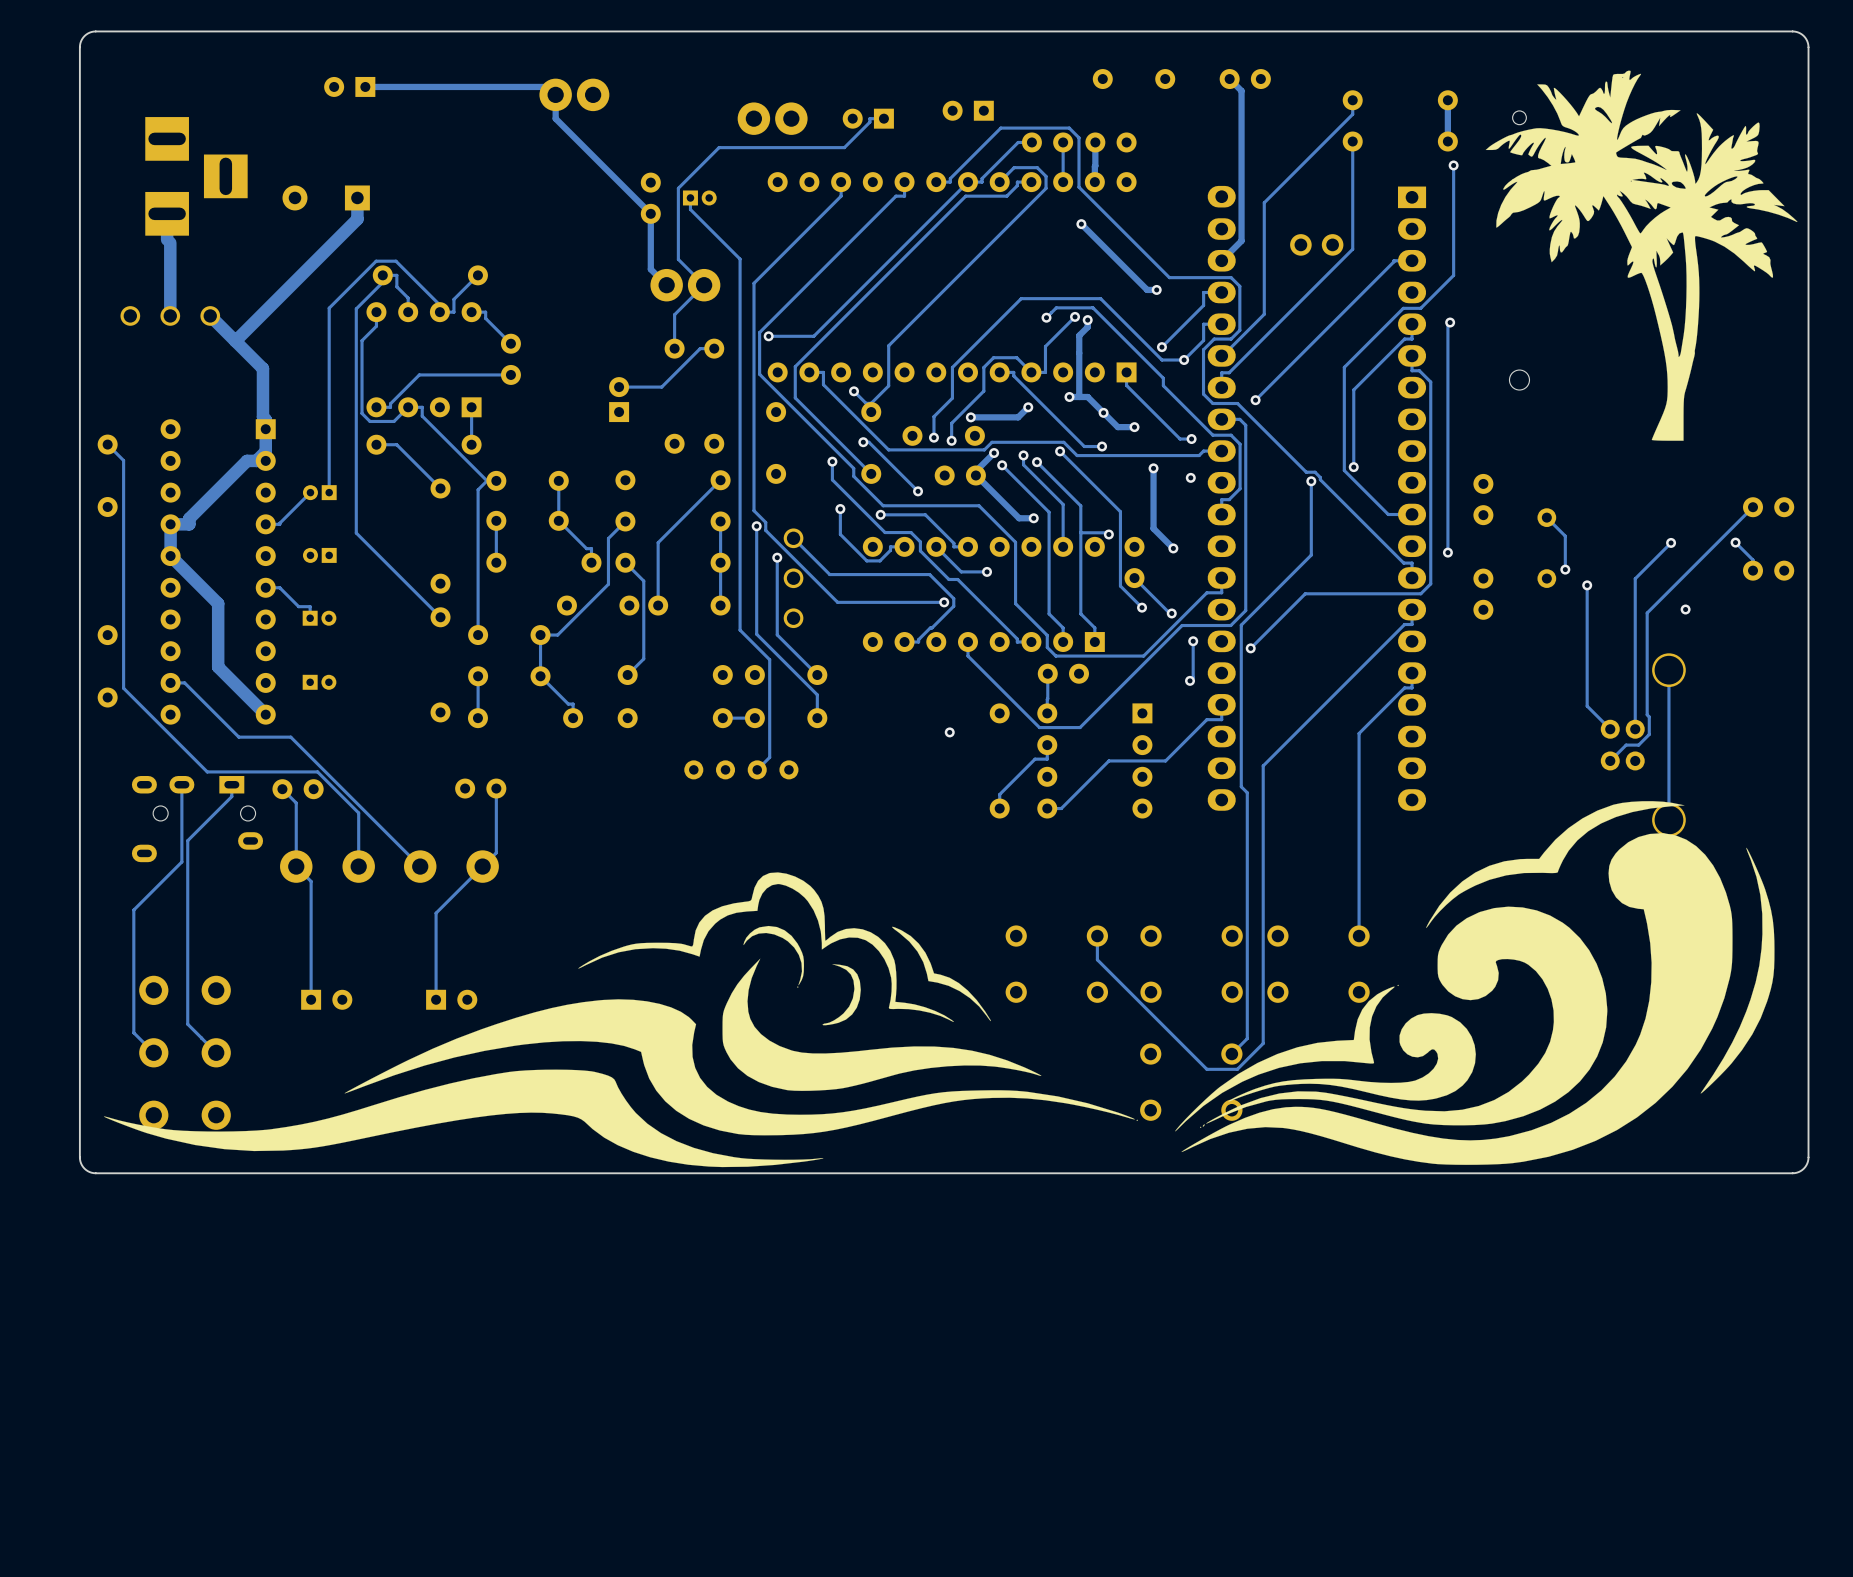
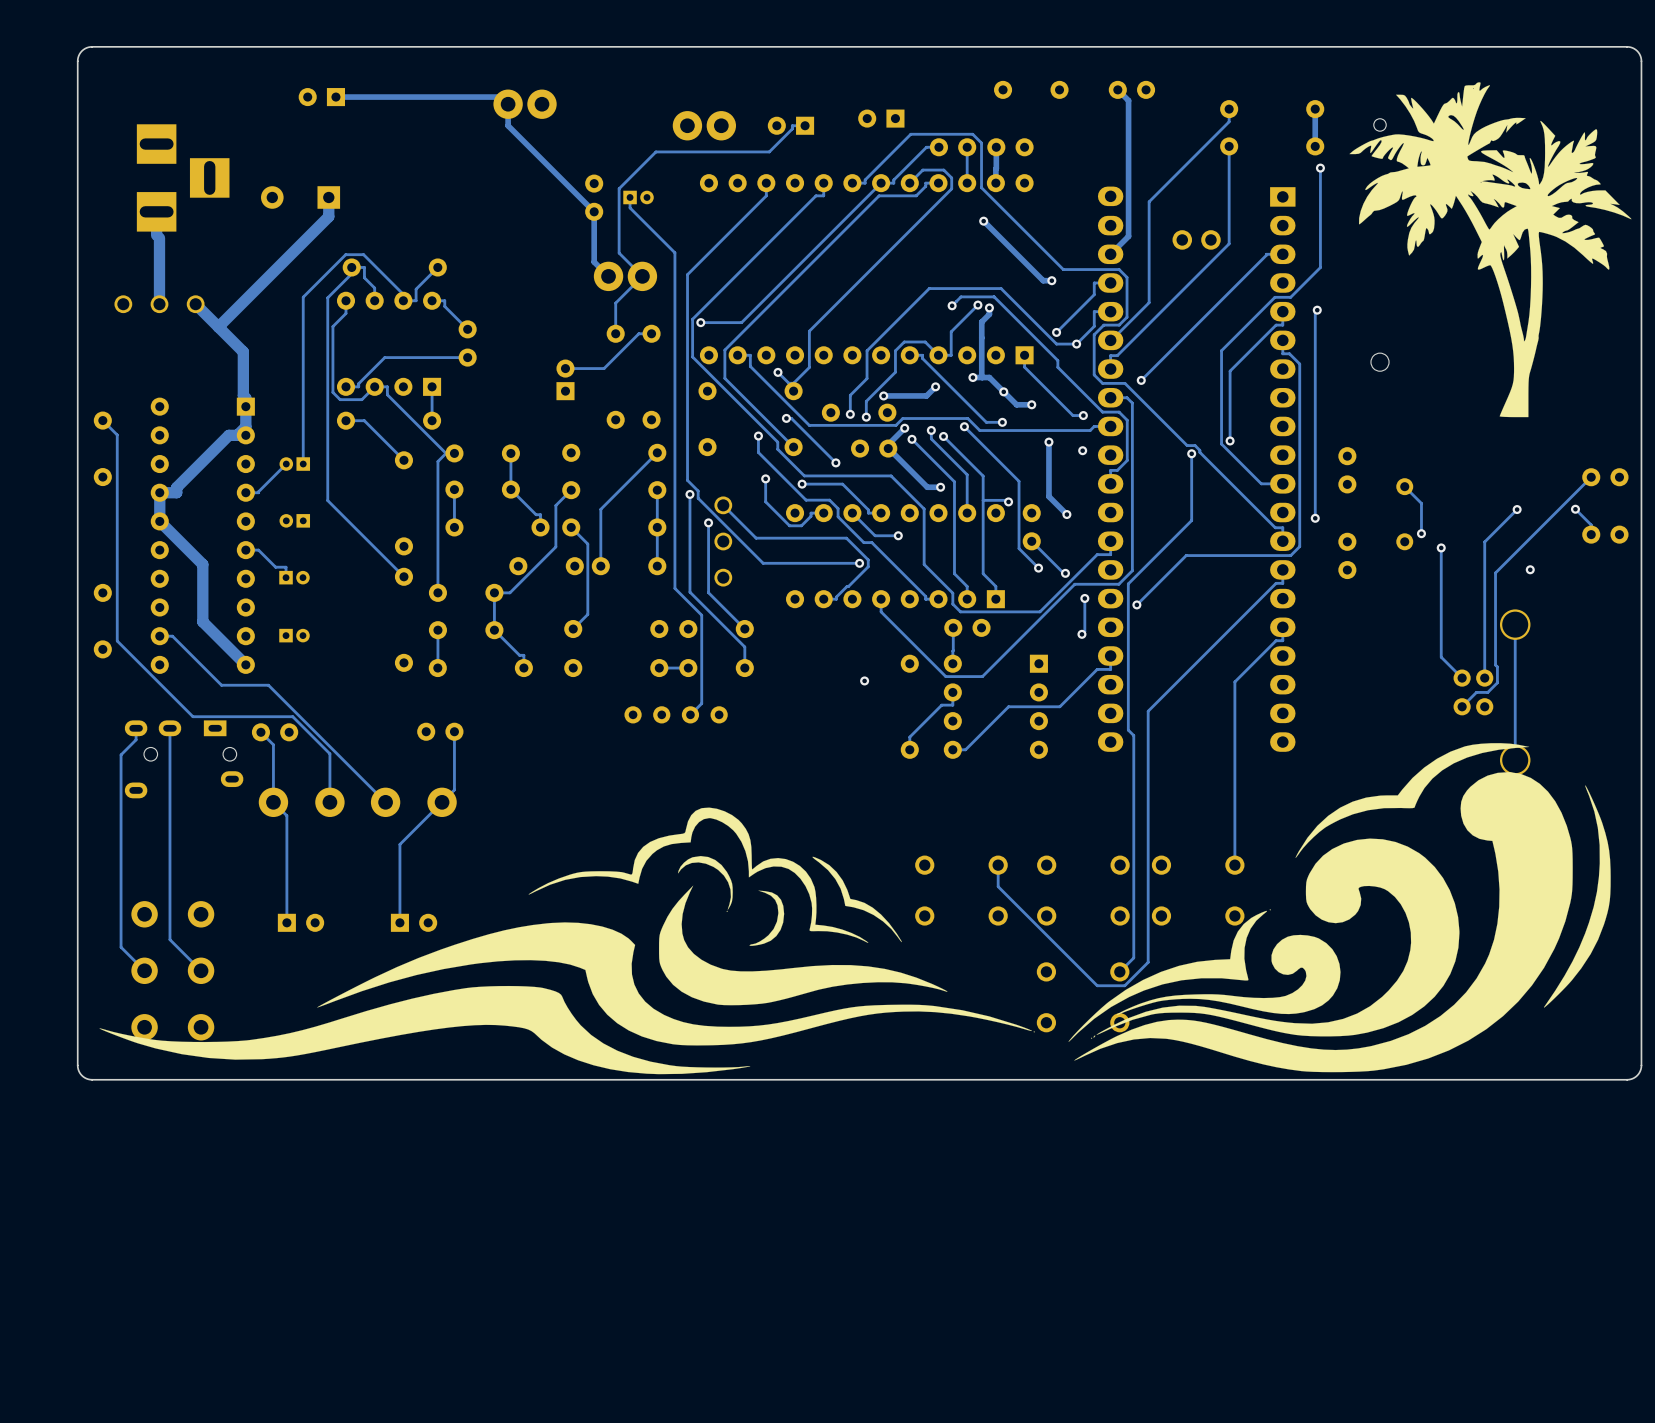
track: none -> (136, 728) (136, 739) (121, 754) (121, 947) (126, 952)
track: (231, 784) (231, 796) (187, 840) (187, 1024) -> none
track: (181, 861) (133, 910) (133, 1032) -> (169, 798) (169, 939) (175, 944)

